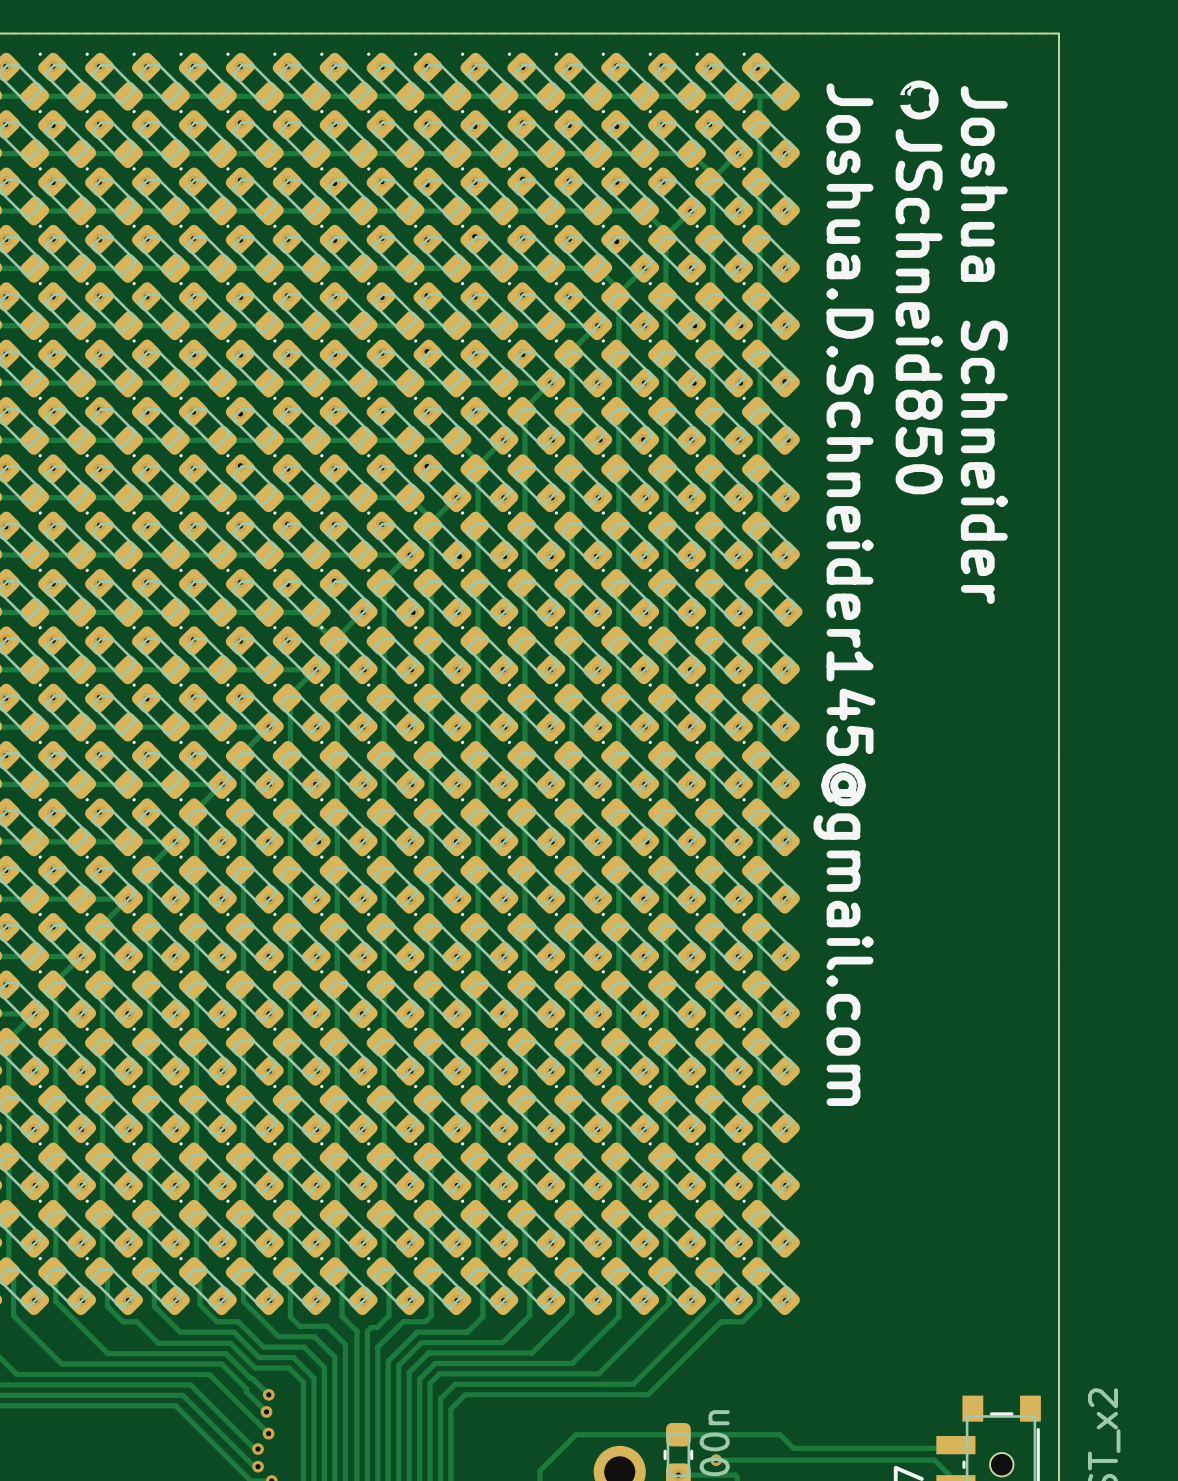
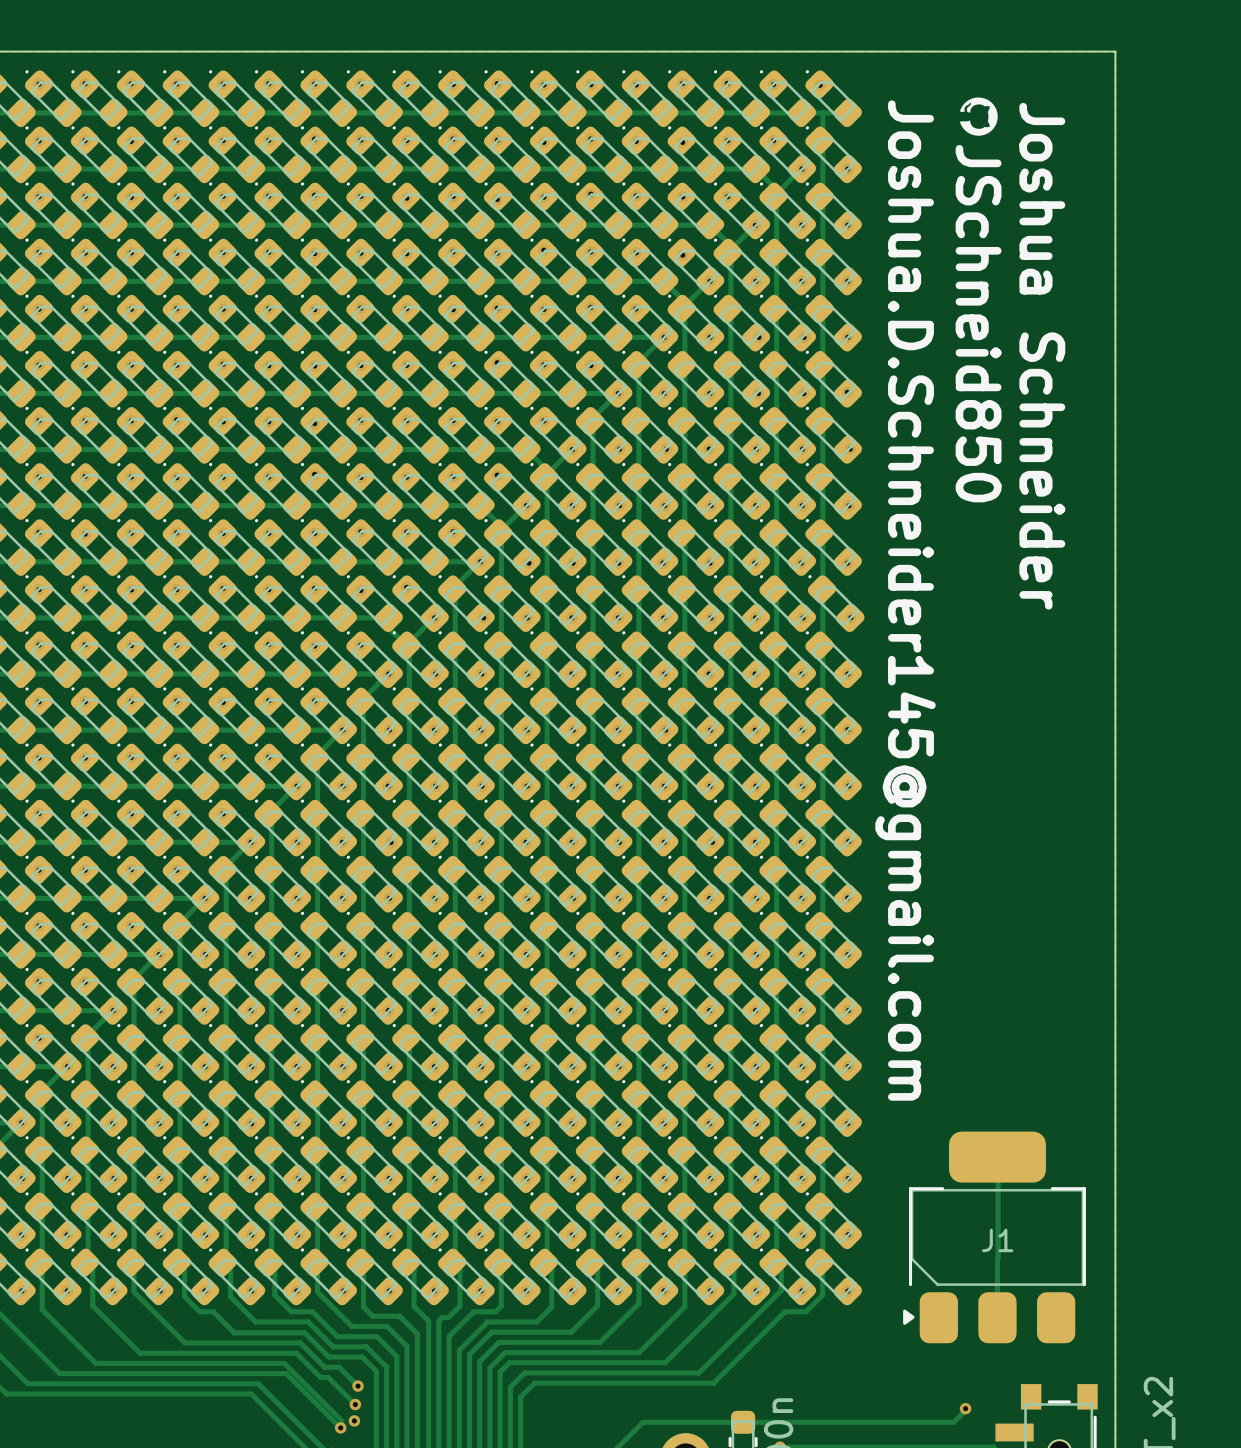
track: none -> (998, 1160) (997, 1317)
part: none -> (994, 1237)
text: none -> J1 (997, 1240)
track: (252, 1378) (268, 1394) -> (326, 1367) (339, 1367) (358, 1386)
track: (190, 1384) (254, 1449) (258, 1449) -> (265, 1373) (286, 1373) (340, 1427)
track: (246, 1388) (246, 1391) (266, 1411) -> (320, 1377) (328, 1377) (355, 1404)
via: (268, 1394) -> none
via: none -> (358, 1386)
via: (266, 1411) -> none
via: none -> (355, 1404)
via: none -> (965, 1408)
via: (268, 1433) -> none
via: none -> (354, 1420)
track: (779, 1434) (793, 1448) (966, 1448) -> (842, 1422) (953, 1422) (966, 1409)
via: none -> (340, 1427)
via: (258, 1449) -> none

